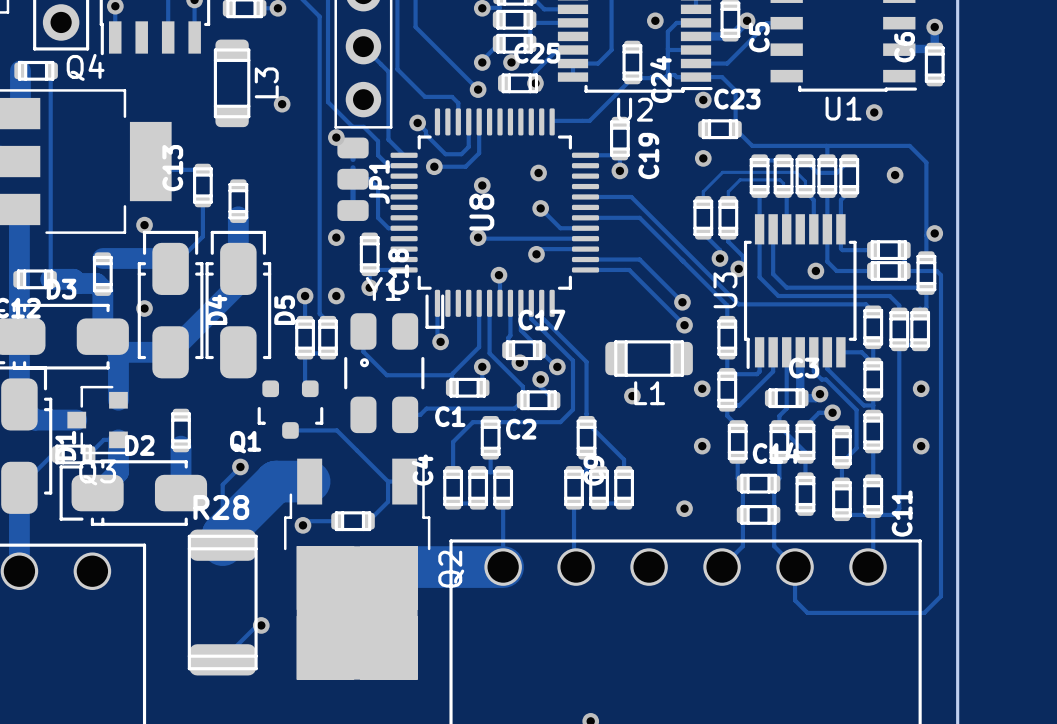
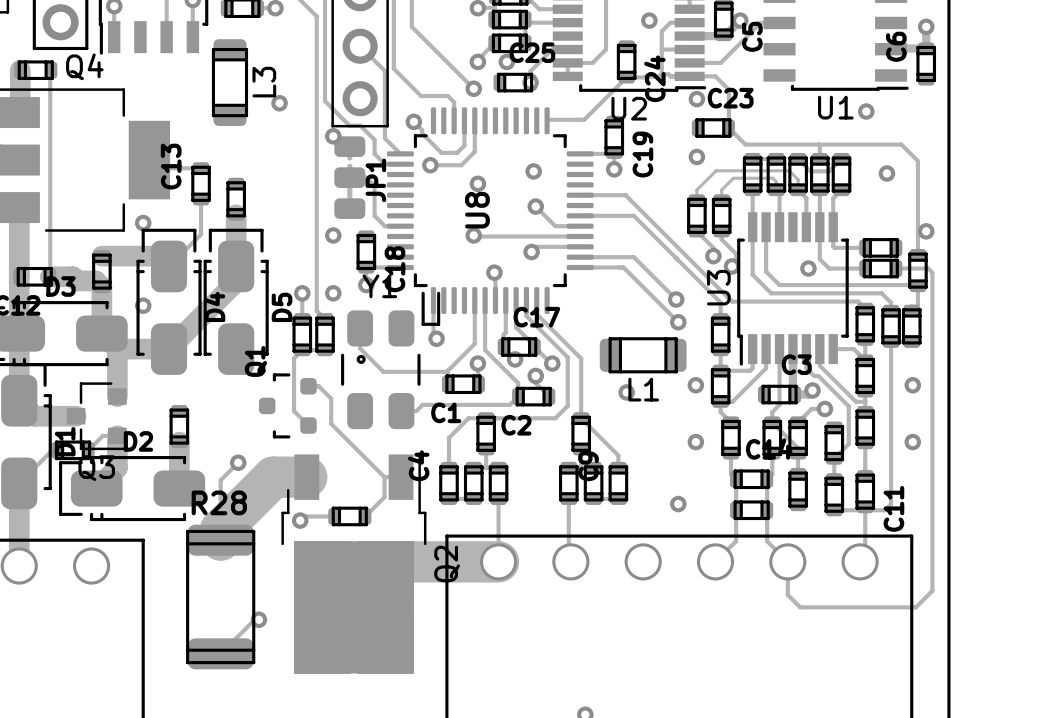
track: (305, 353) (305, 383) (310, 388) -> (302, 350) (294, 358) (294, 411) (308, 425)
Q1 rotation: 0° (290, 409) -> 90° clockwise (287, 405)
track: (290, 430) (336, 430) -> (308, 386) (318, 386) (331, 398) (331, 423) (333, 426)

